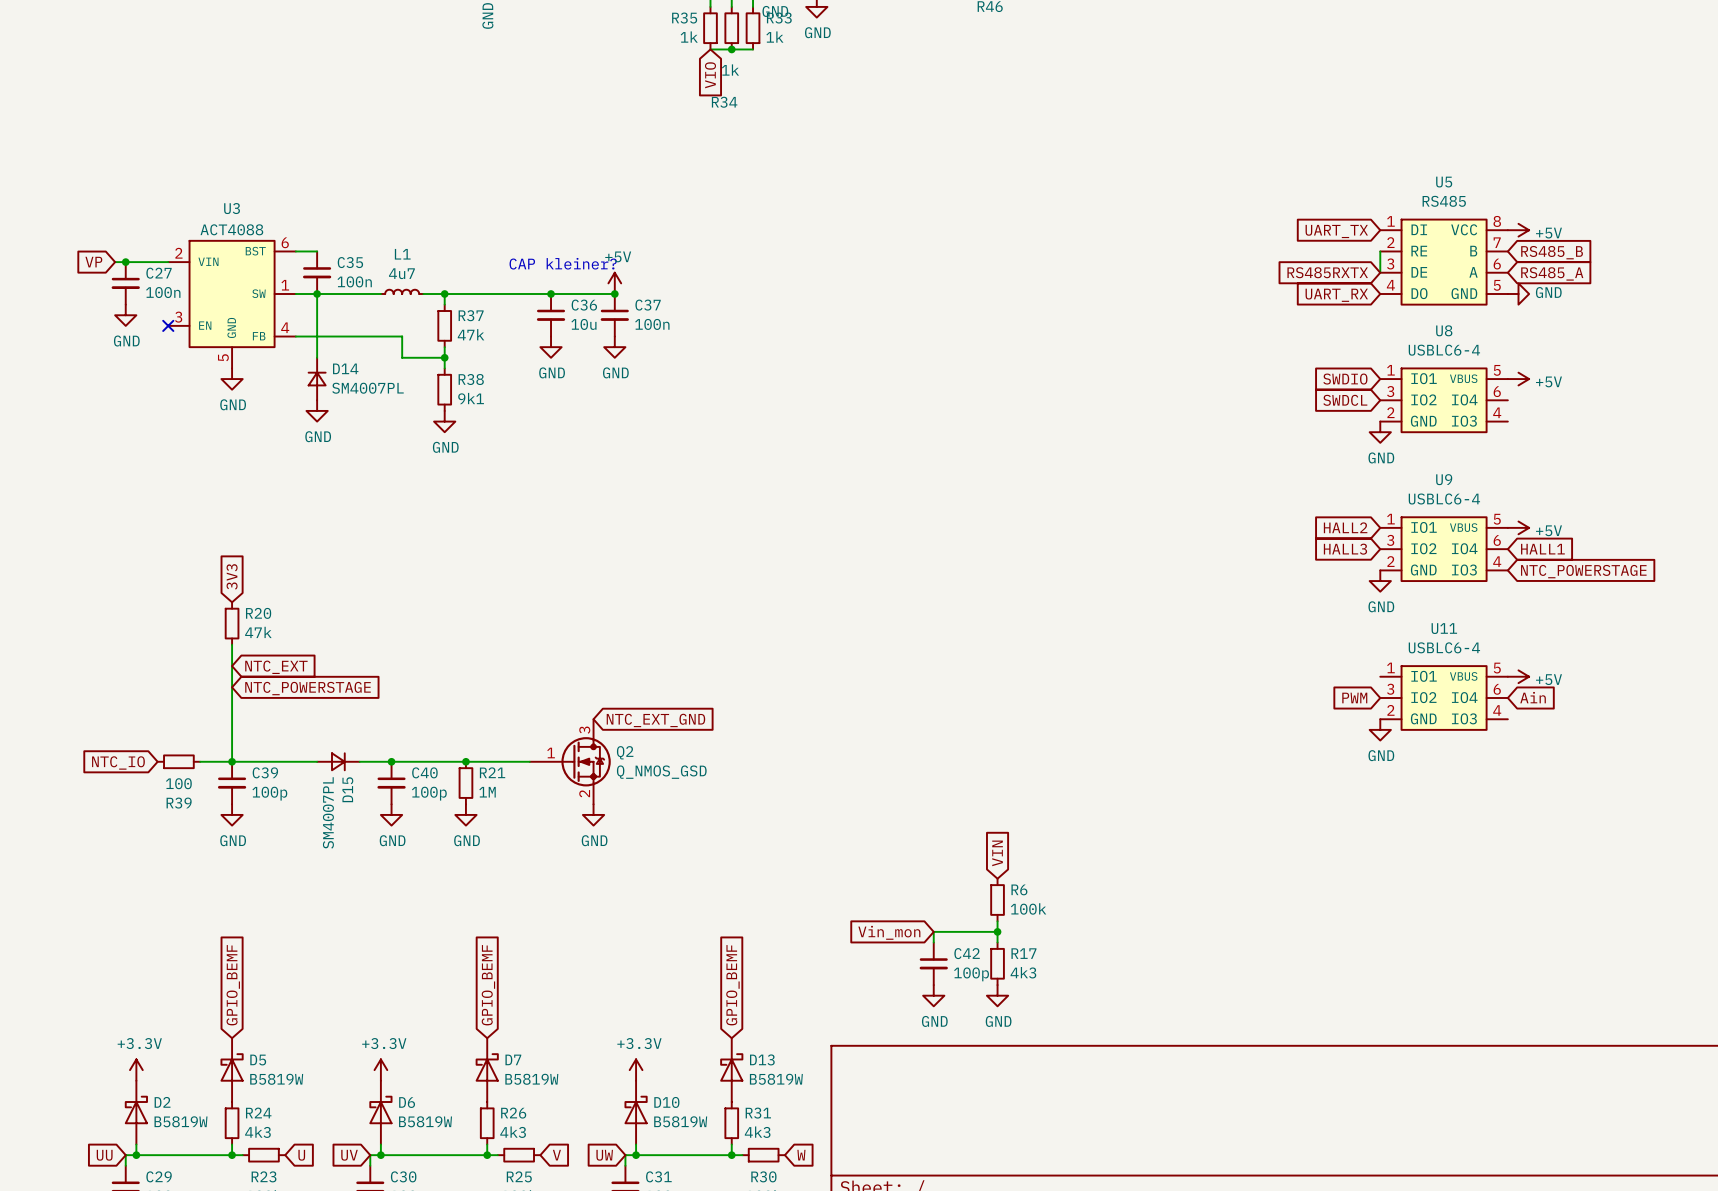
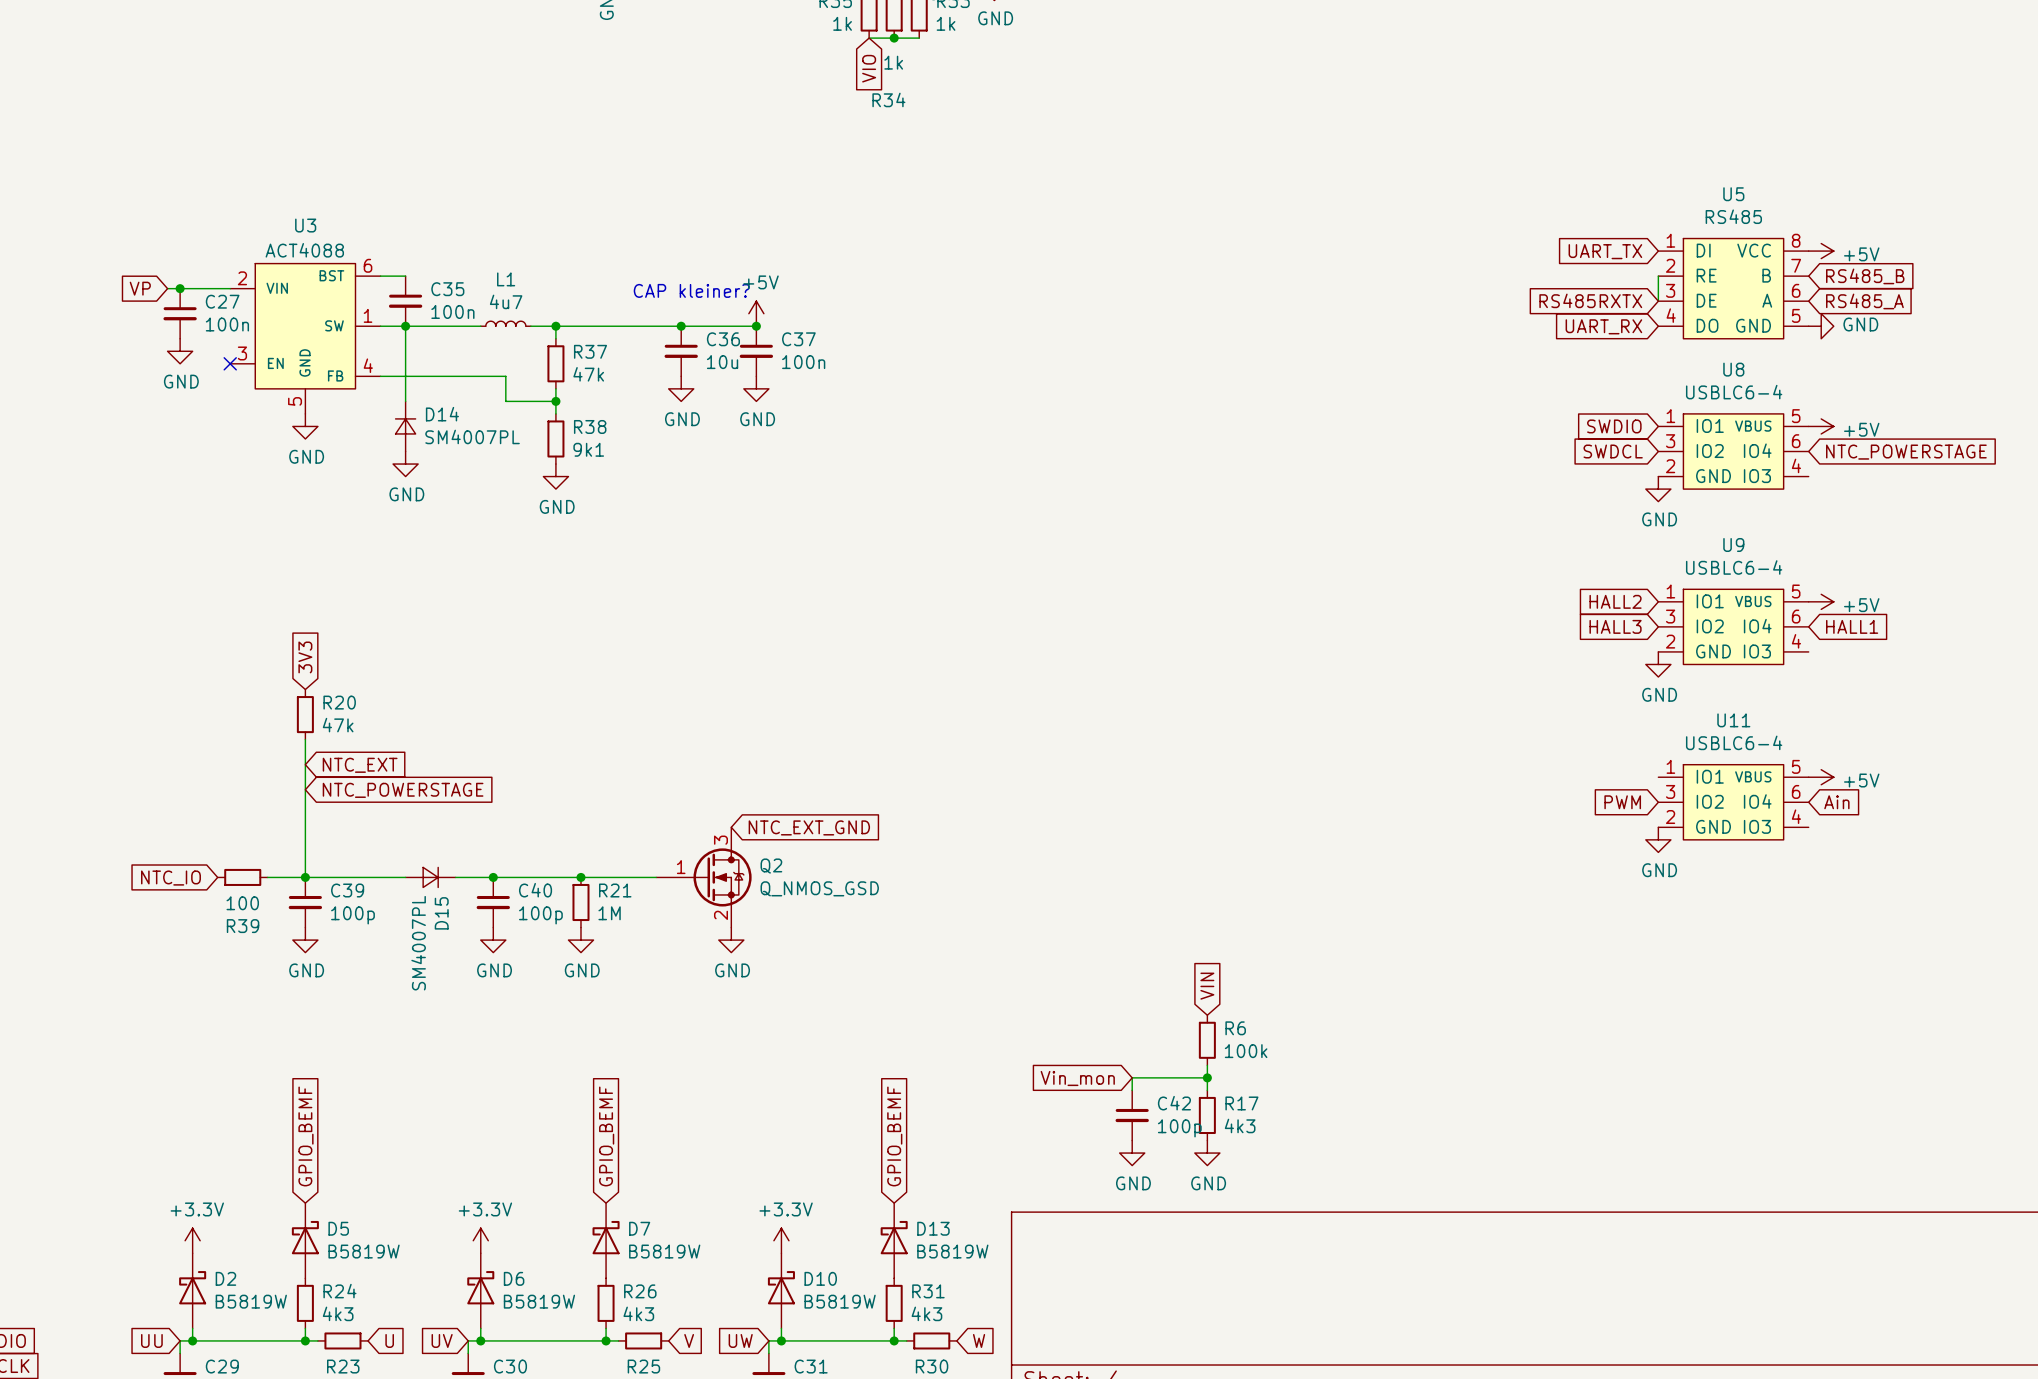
global label position: NTC_POWERSTAGE (1583, 571) -> NTC_POWERSTAGE (1906, 452)

